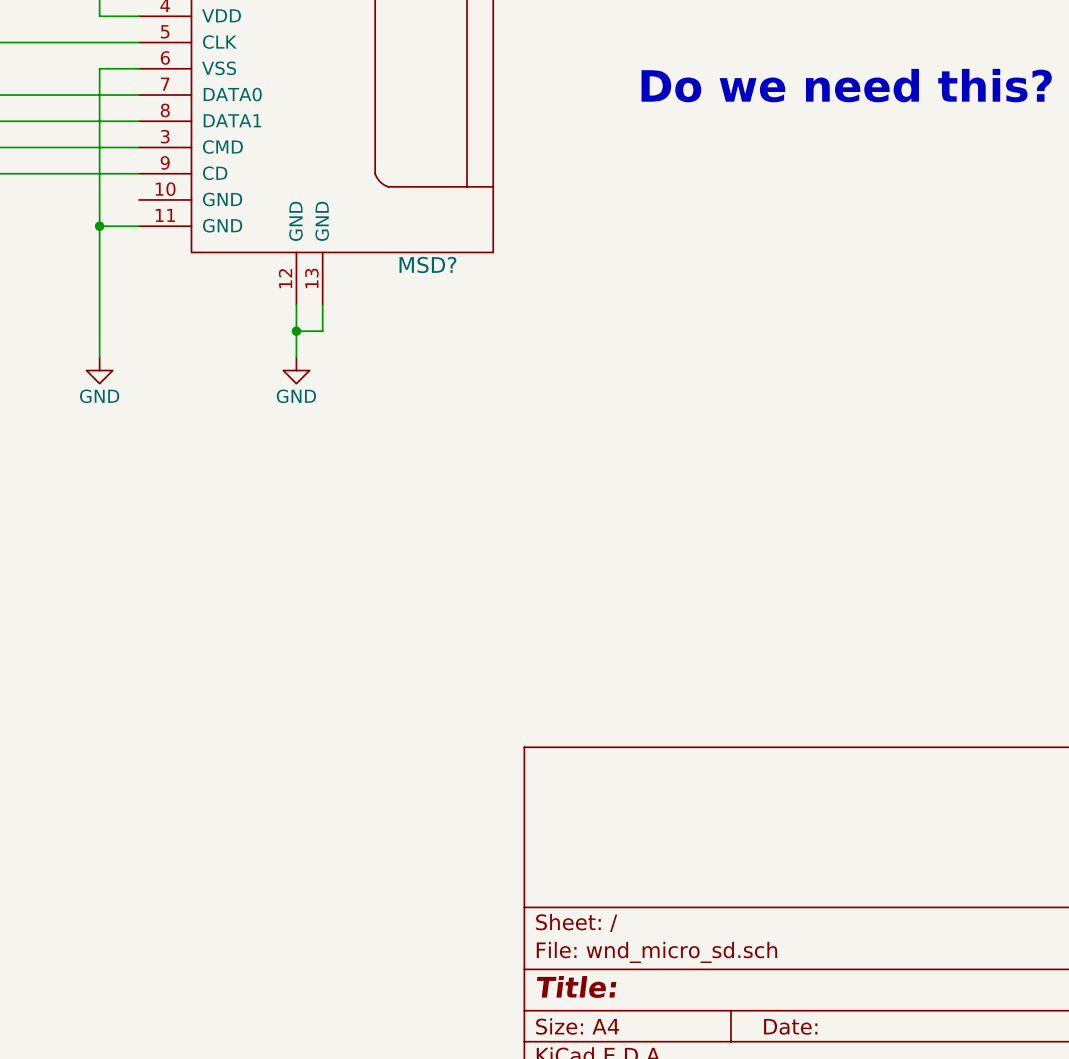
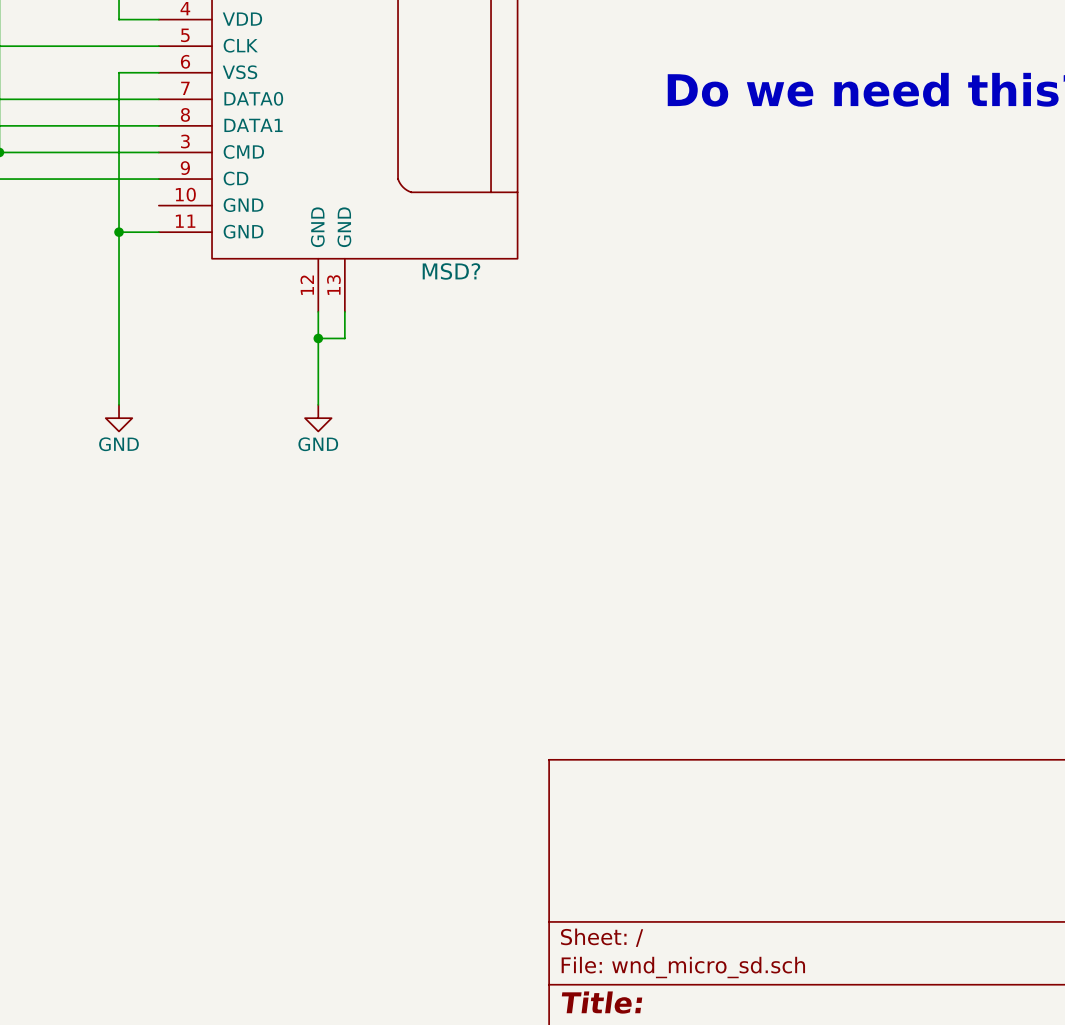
wire: none -> (119, 365) (119, 404)
wire: none -> (318, 365) (318, 404)
power symbol position: GND (99, 370) -> GND (119, 418)
power symbol position: GND (296, 370) -> GND (318, 418)

